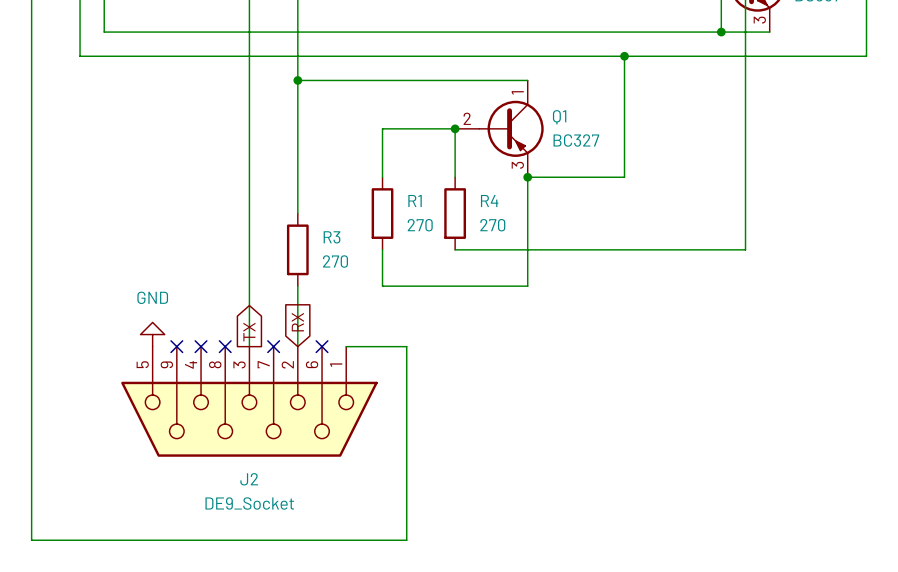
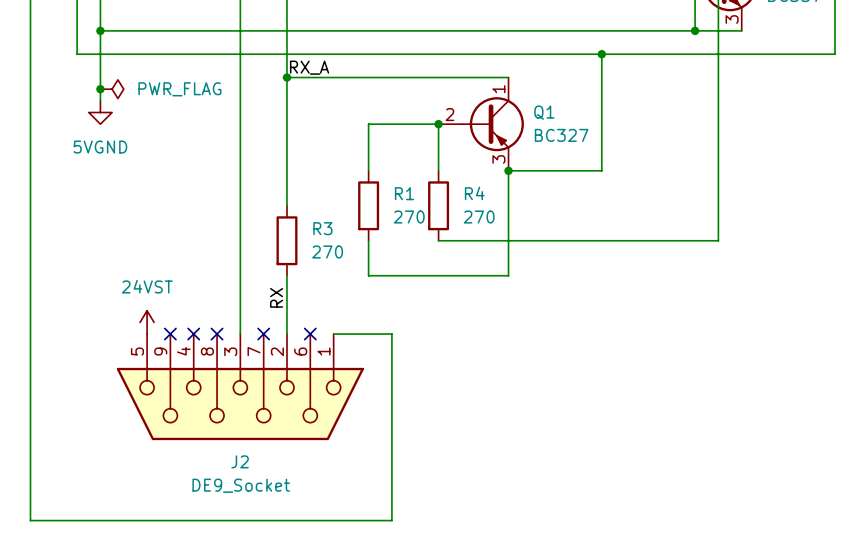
wire: none -> (100, 30) (100, 100)
junction: none -> (100, 30)
label: none -> RX_A (309, 67)
junction: none -> (100, 89)
power symbol: none -> PWR_FLAG (112, 89)
power symbol: none -> 5VGND (100, 112)
label: none -> RX (276, 297)
global label: RX (297, 322) -> none
global label: TX (249, 332) -> none
power symbol: GND (152, 334) -> 24VST (147, 322)

